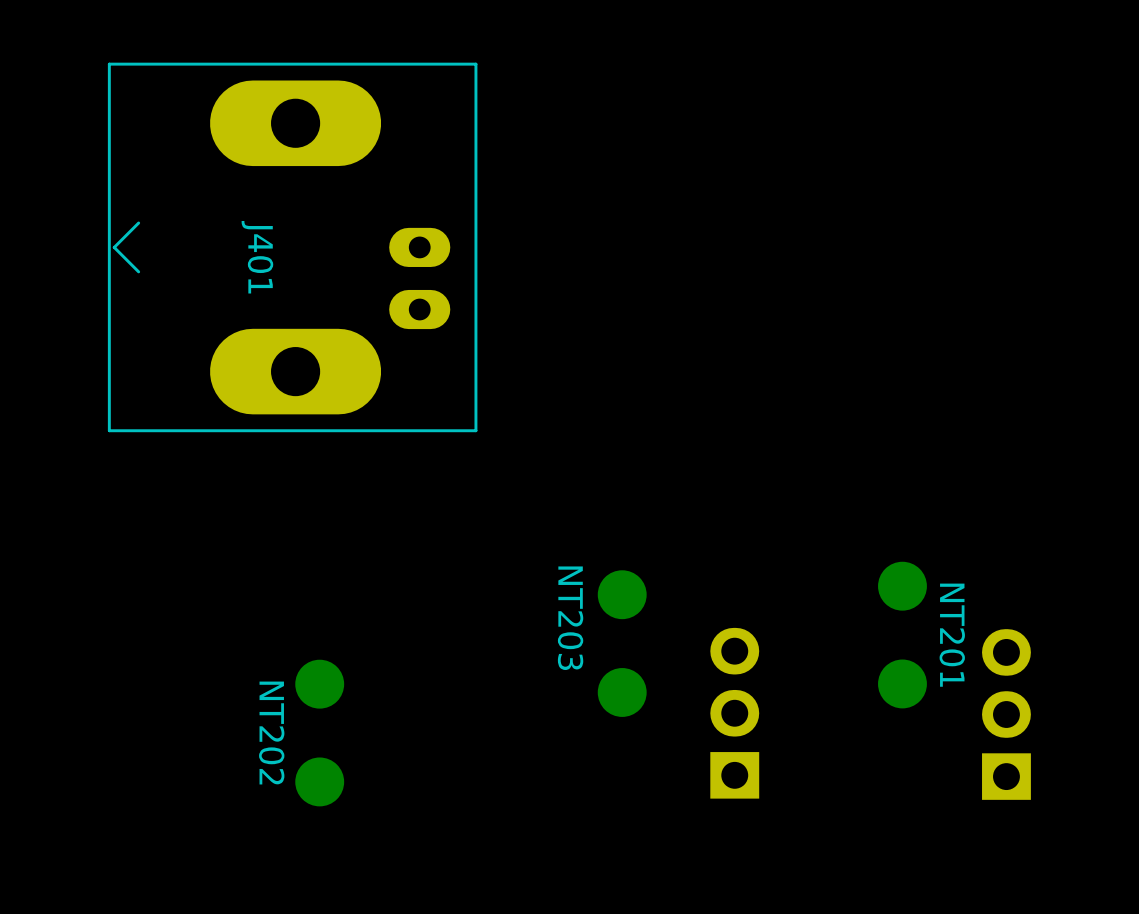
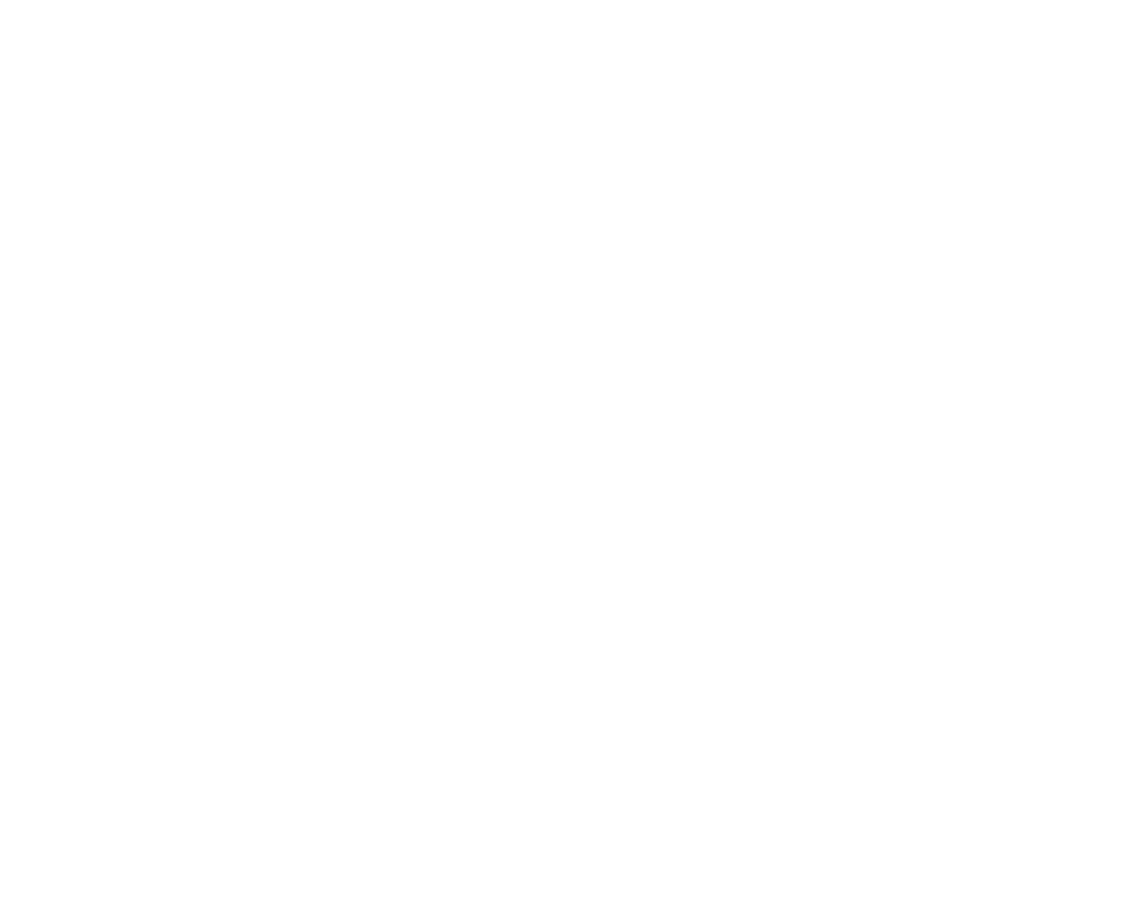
J401: (292, 247) -> none
NT201: (902, 635) -> none
NT203: (622, 643) -> none
part: (734, 713) -> none
part: (1006, 714) -> none
NT202: (319, 733) -> none

